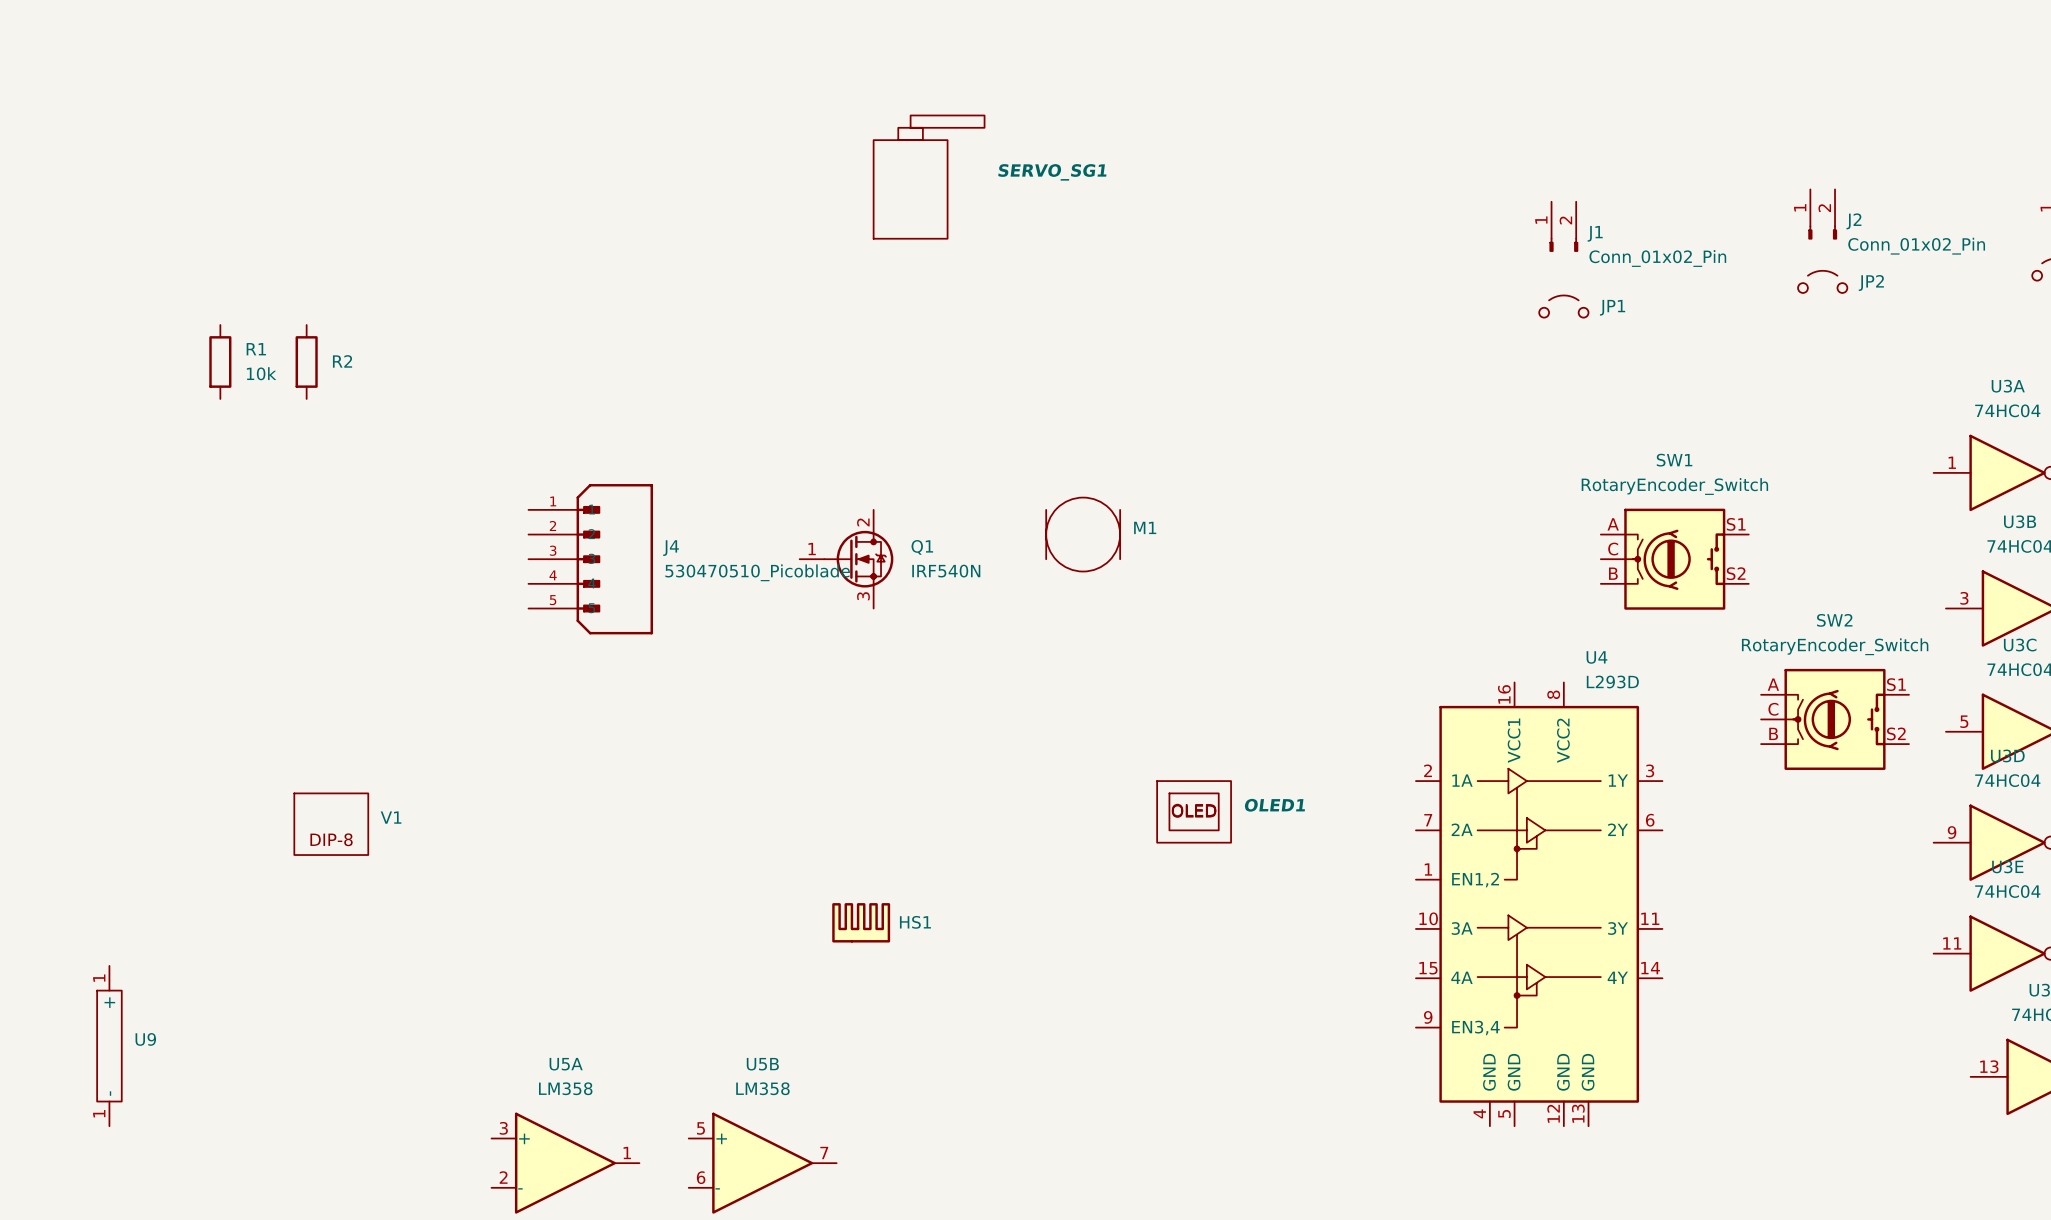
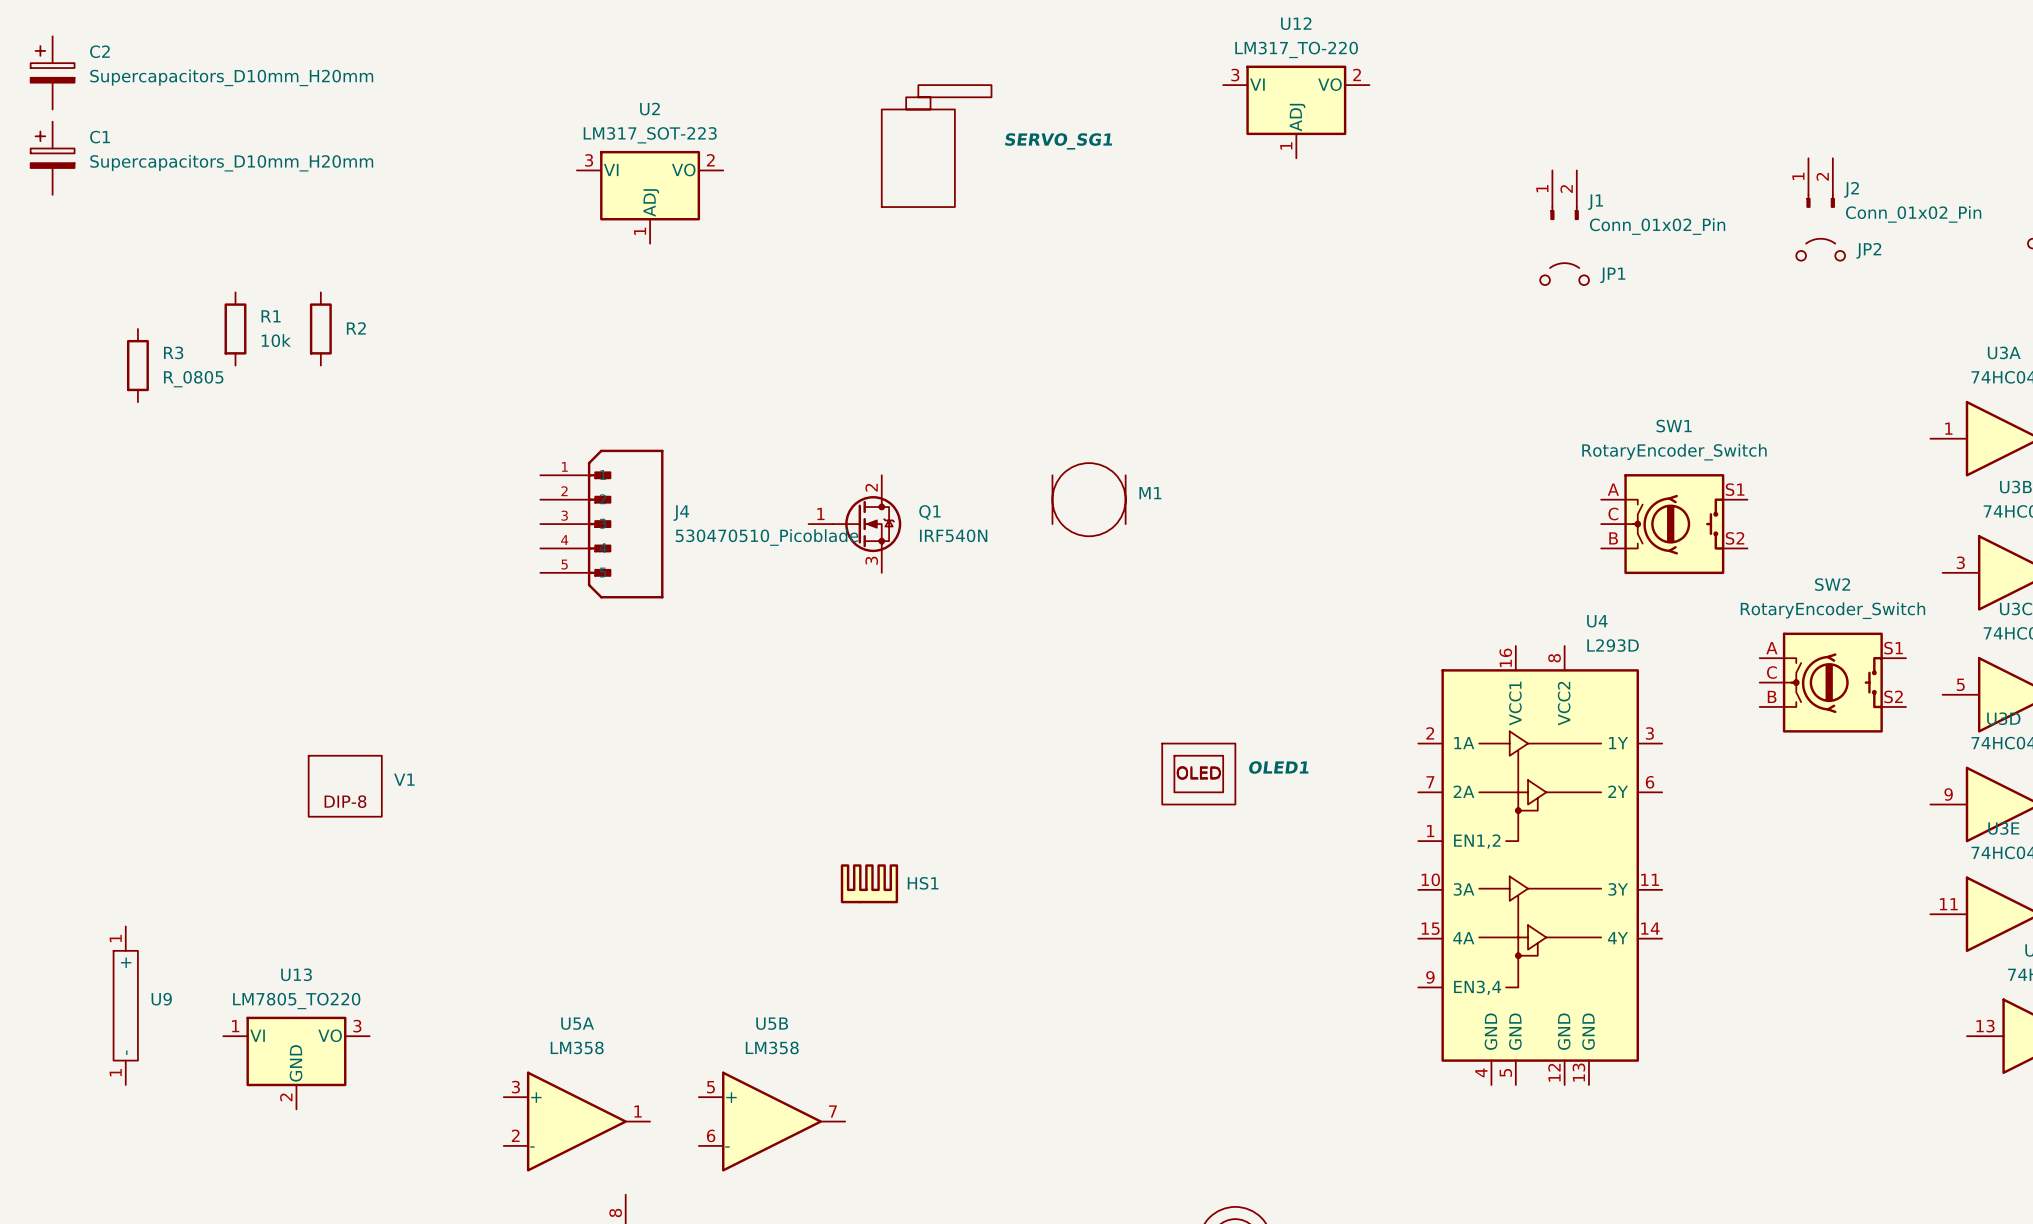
C2: none -> Supercapacitors_D10mm_H20mm (52, 72)
U12: none -> LM317_TO-220 (1296, 111)
C1: none -> Supercapacitors_D10mm_H20mm (52, 158)
U2: none -> LM317_SOT-223 (650, 197)
R3: none -> R_0805 (137, 365)
U13: none -> LM7805_TO220 (296, 1063)

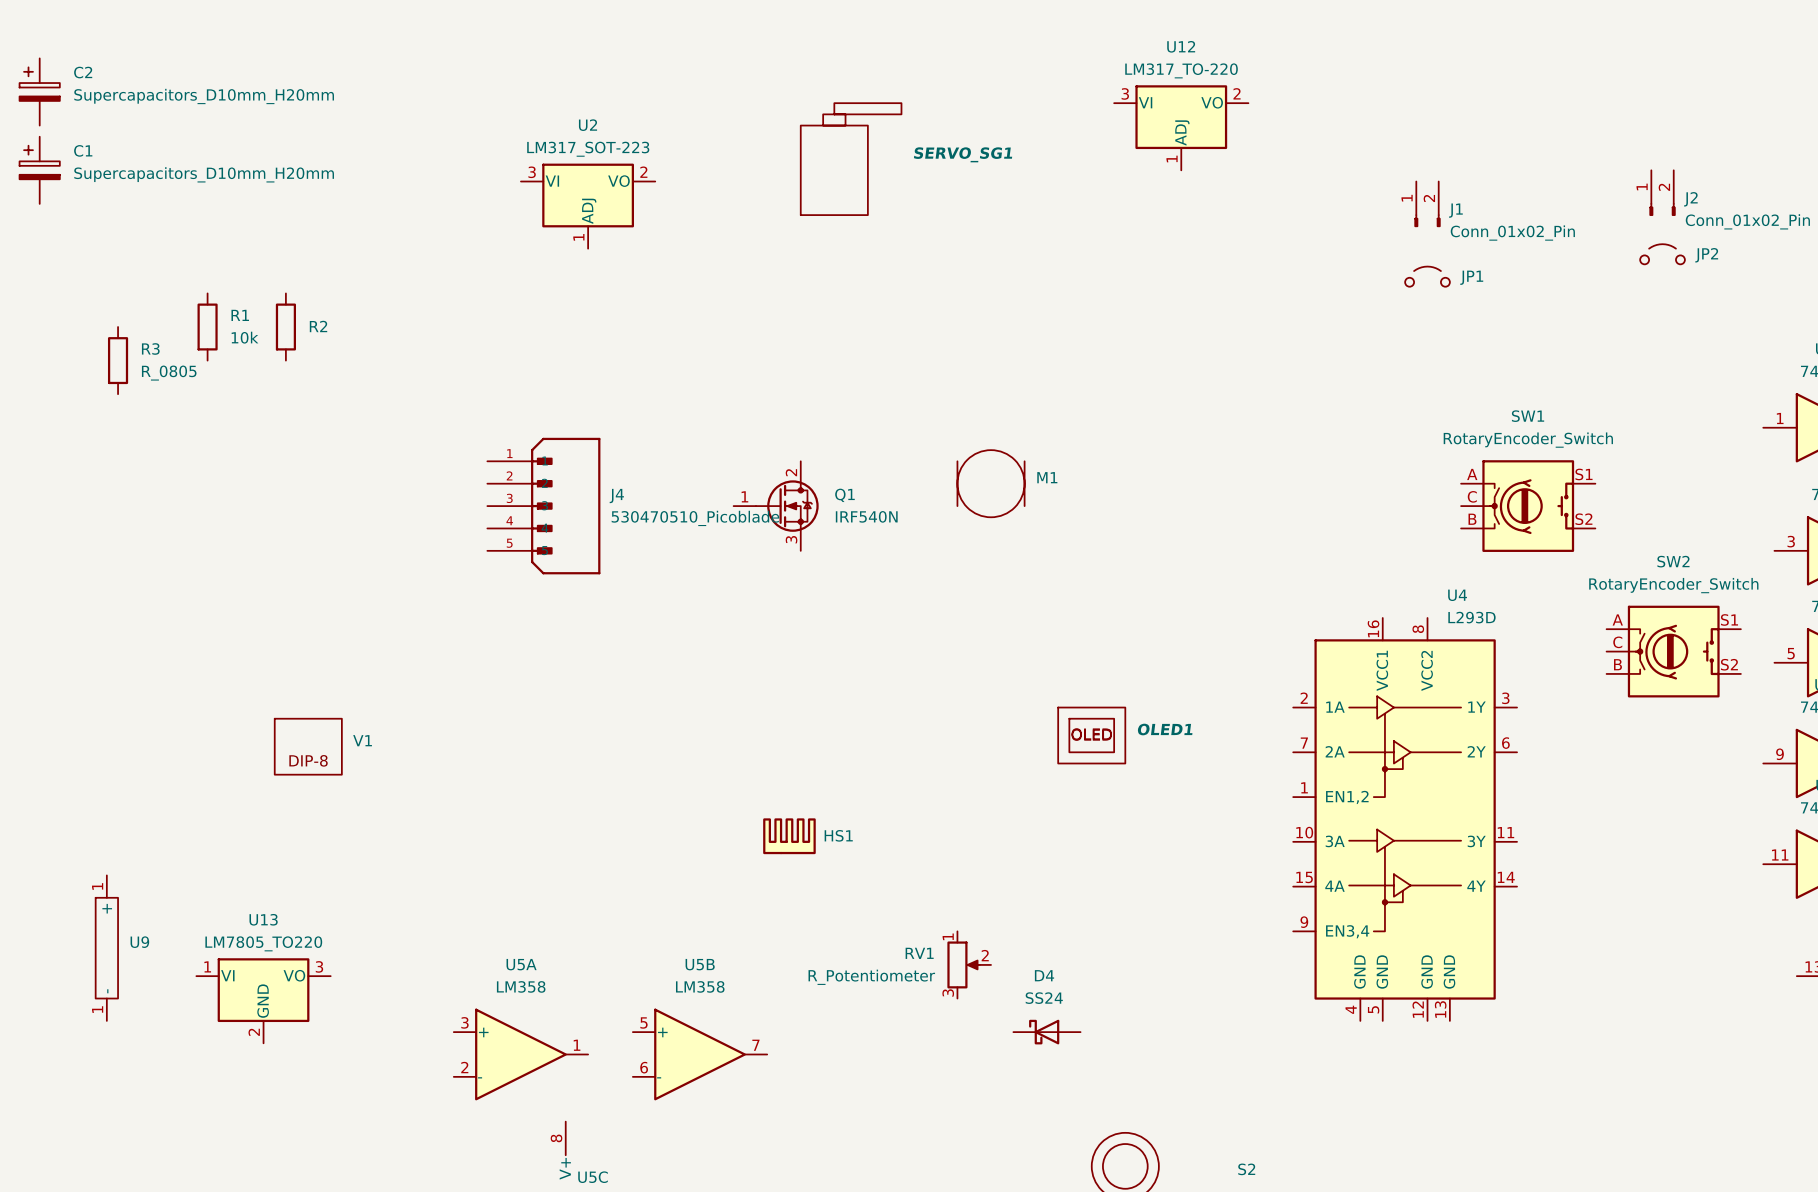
RV1: none -> R_Potentiometer (969, 964)
D4: none -> SS24 (1046, 1032)

